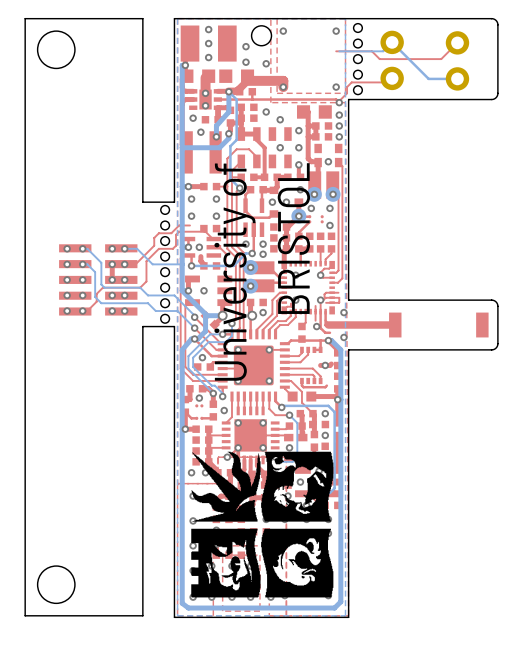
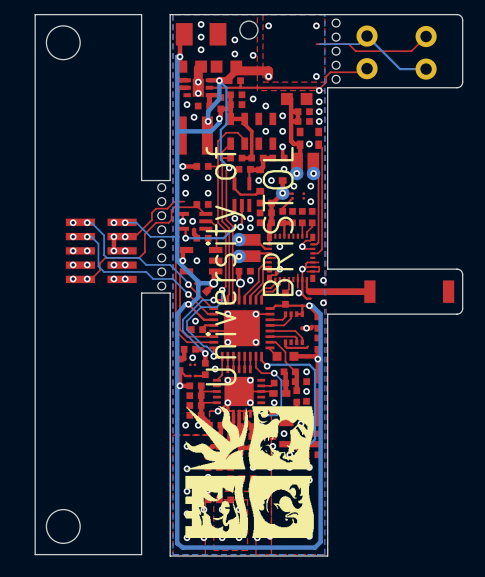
part footprint: [180, 25, 237, 62] -> [175, 23, 227, 46]

